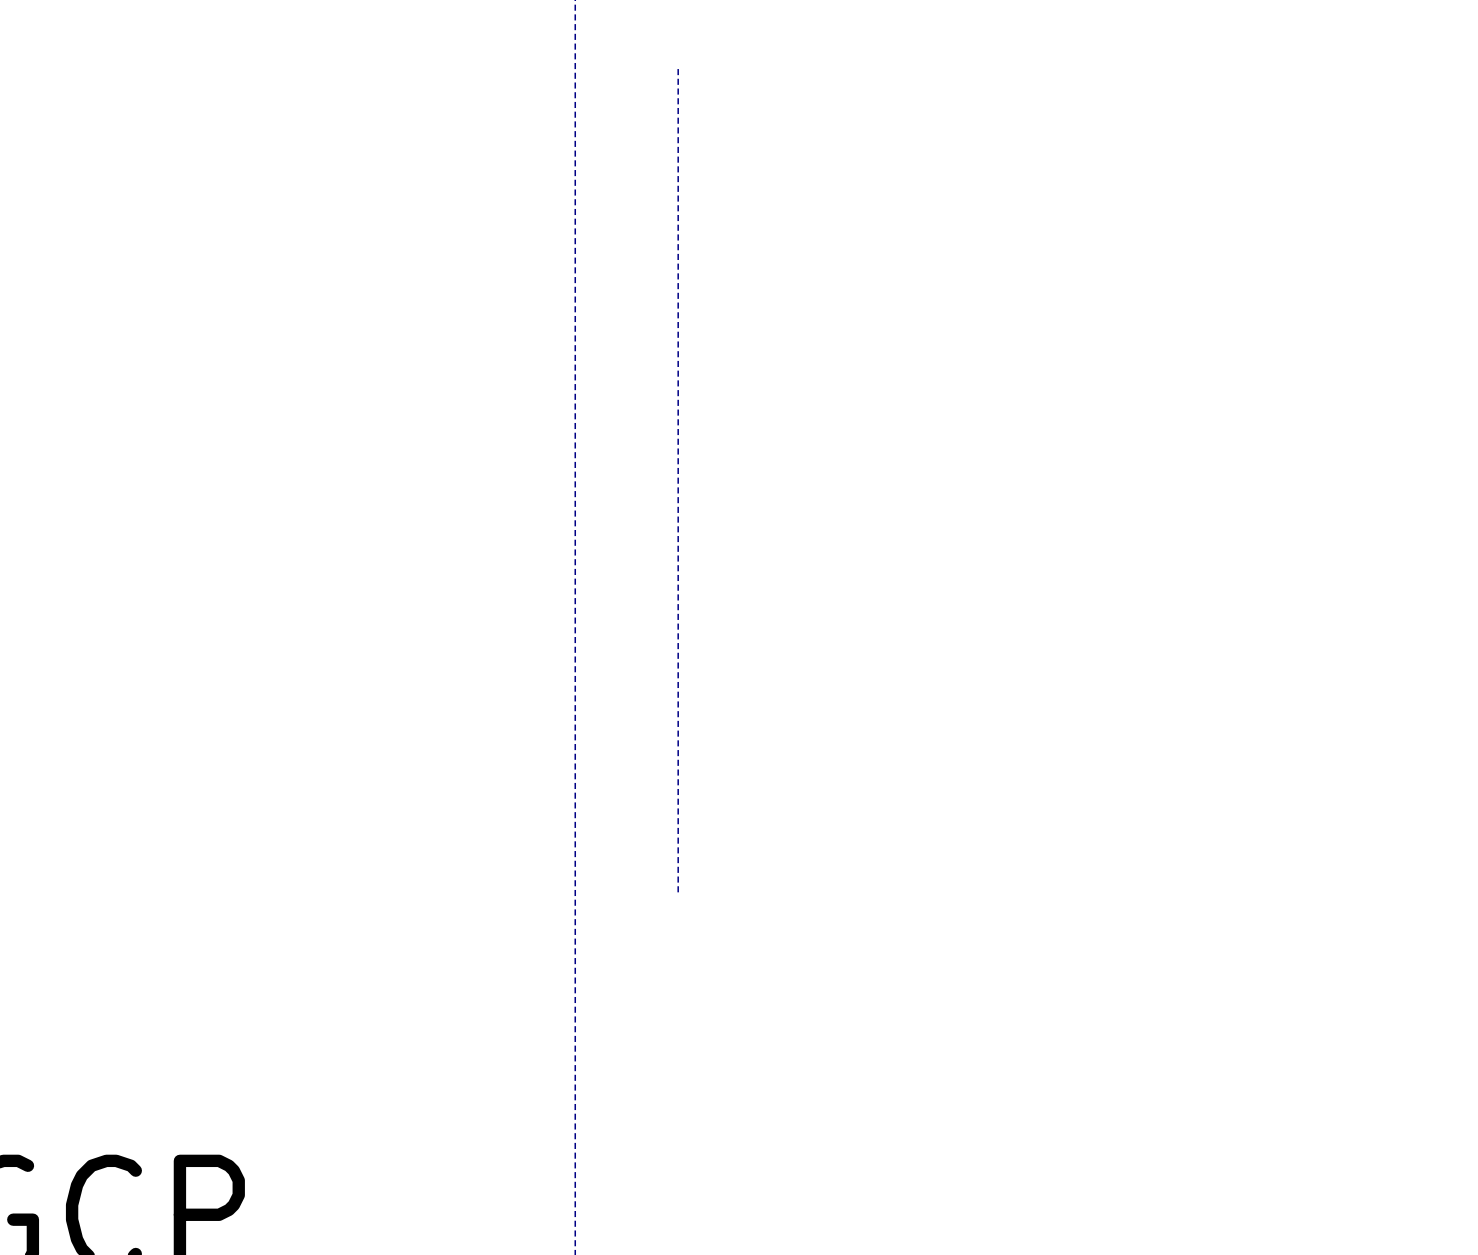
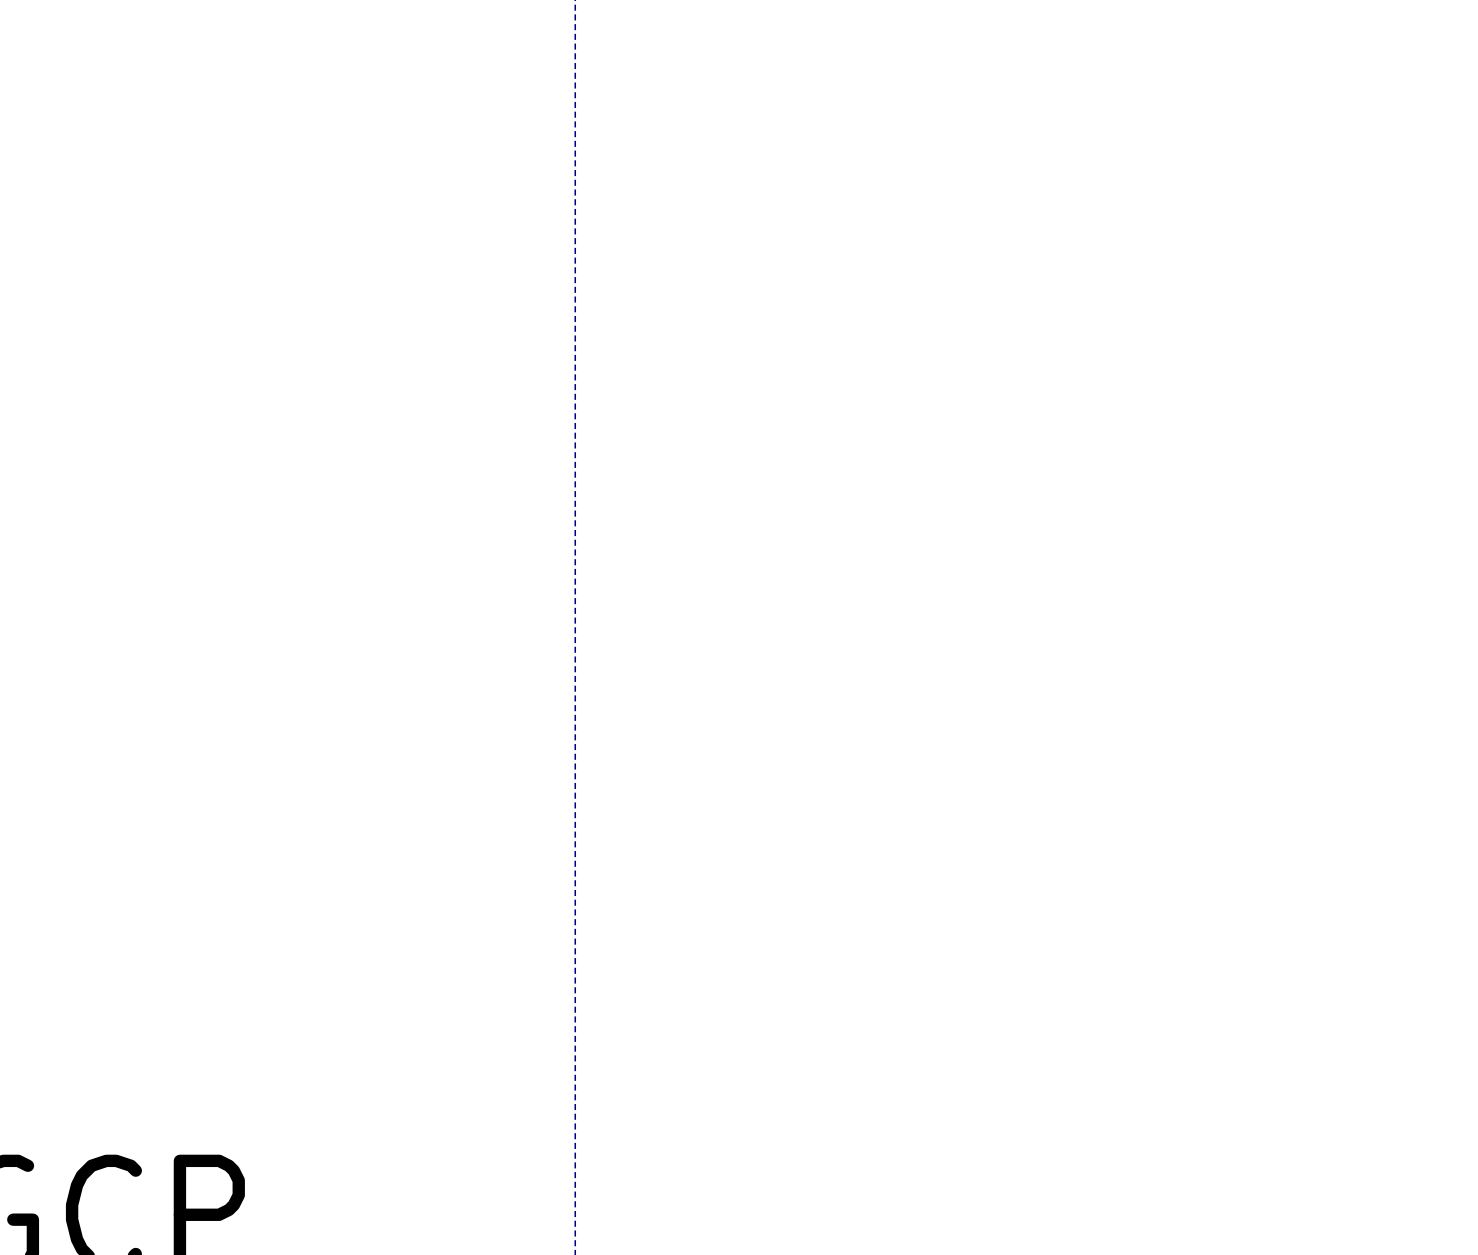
line: (678, 69) (678, 892) -> none

